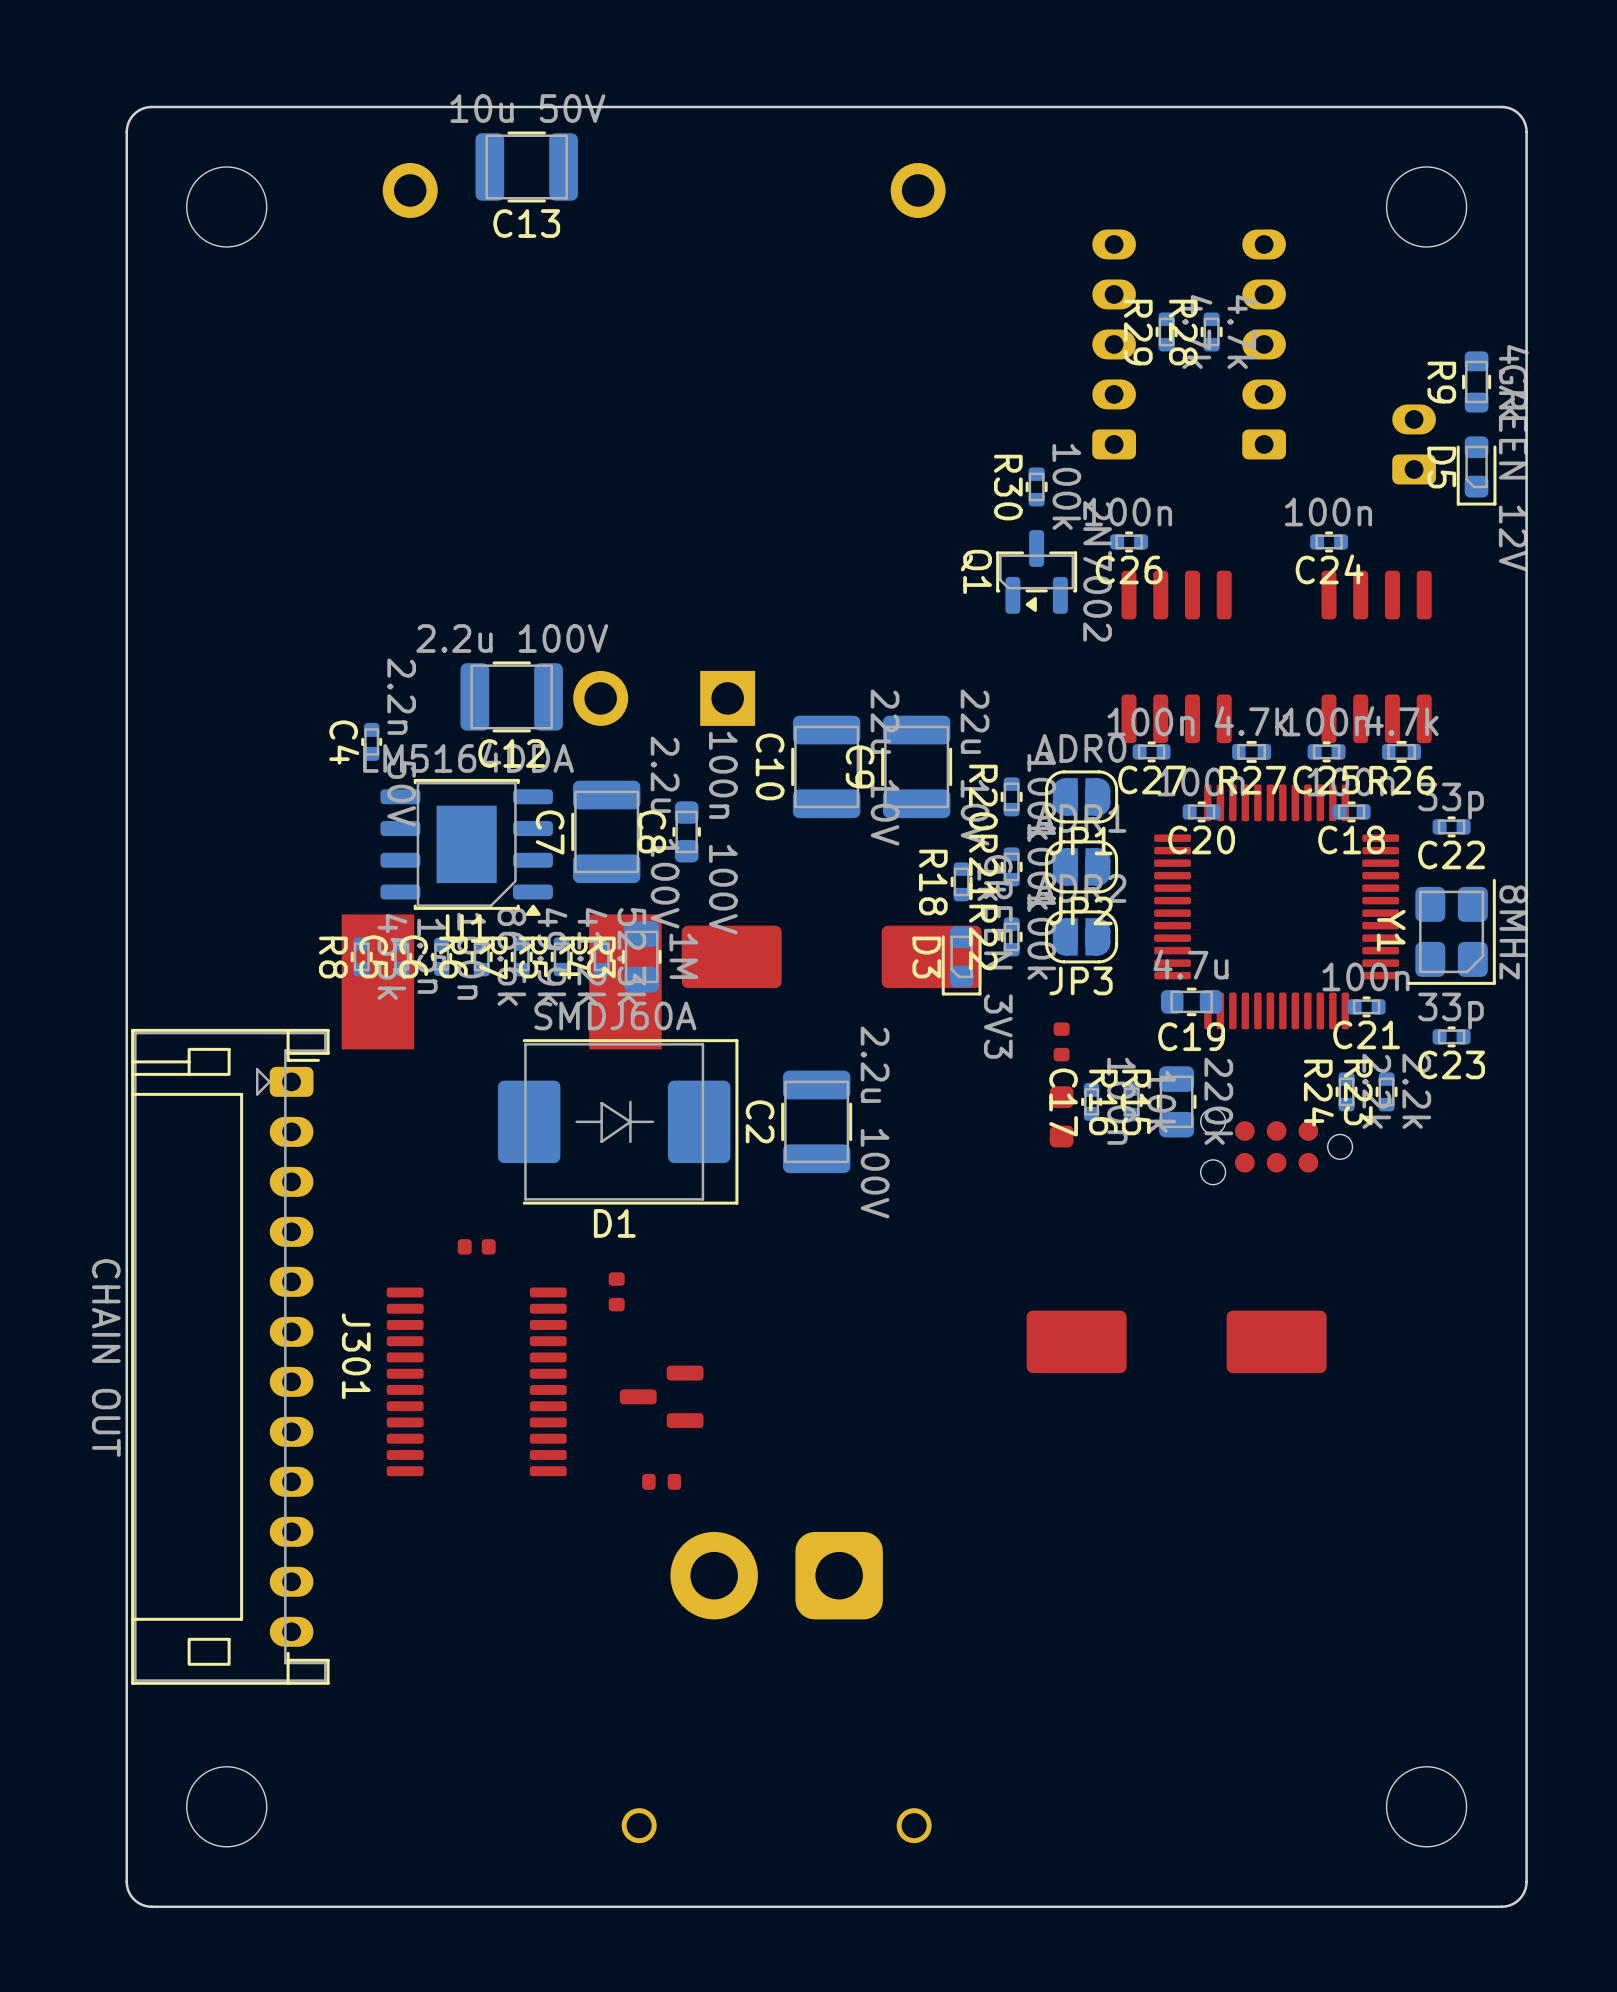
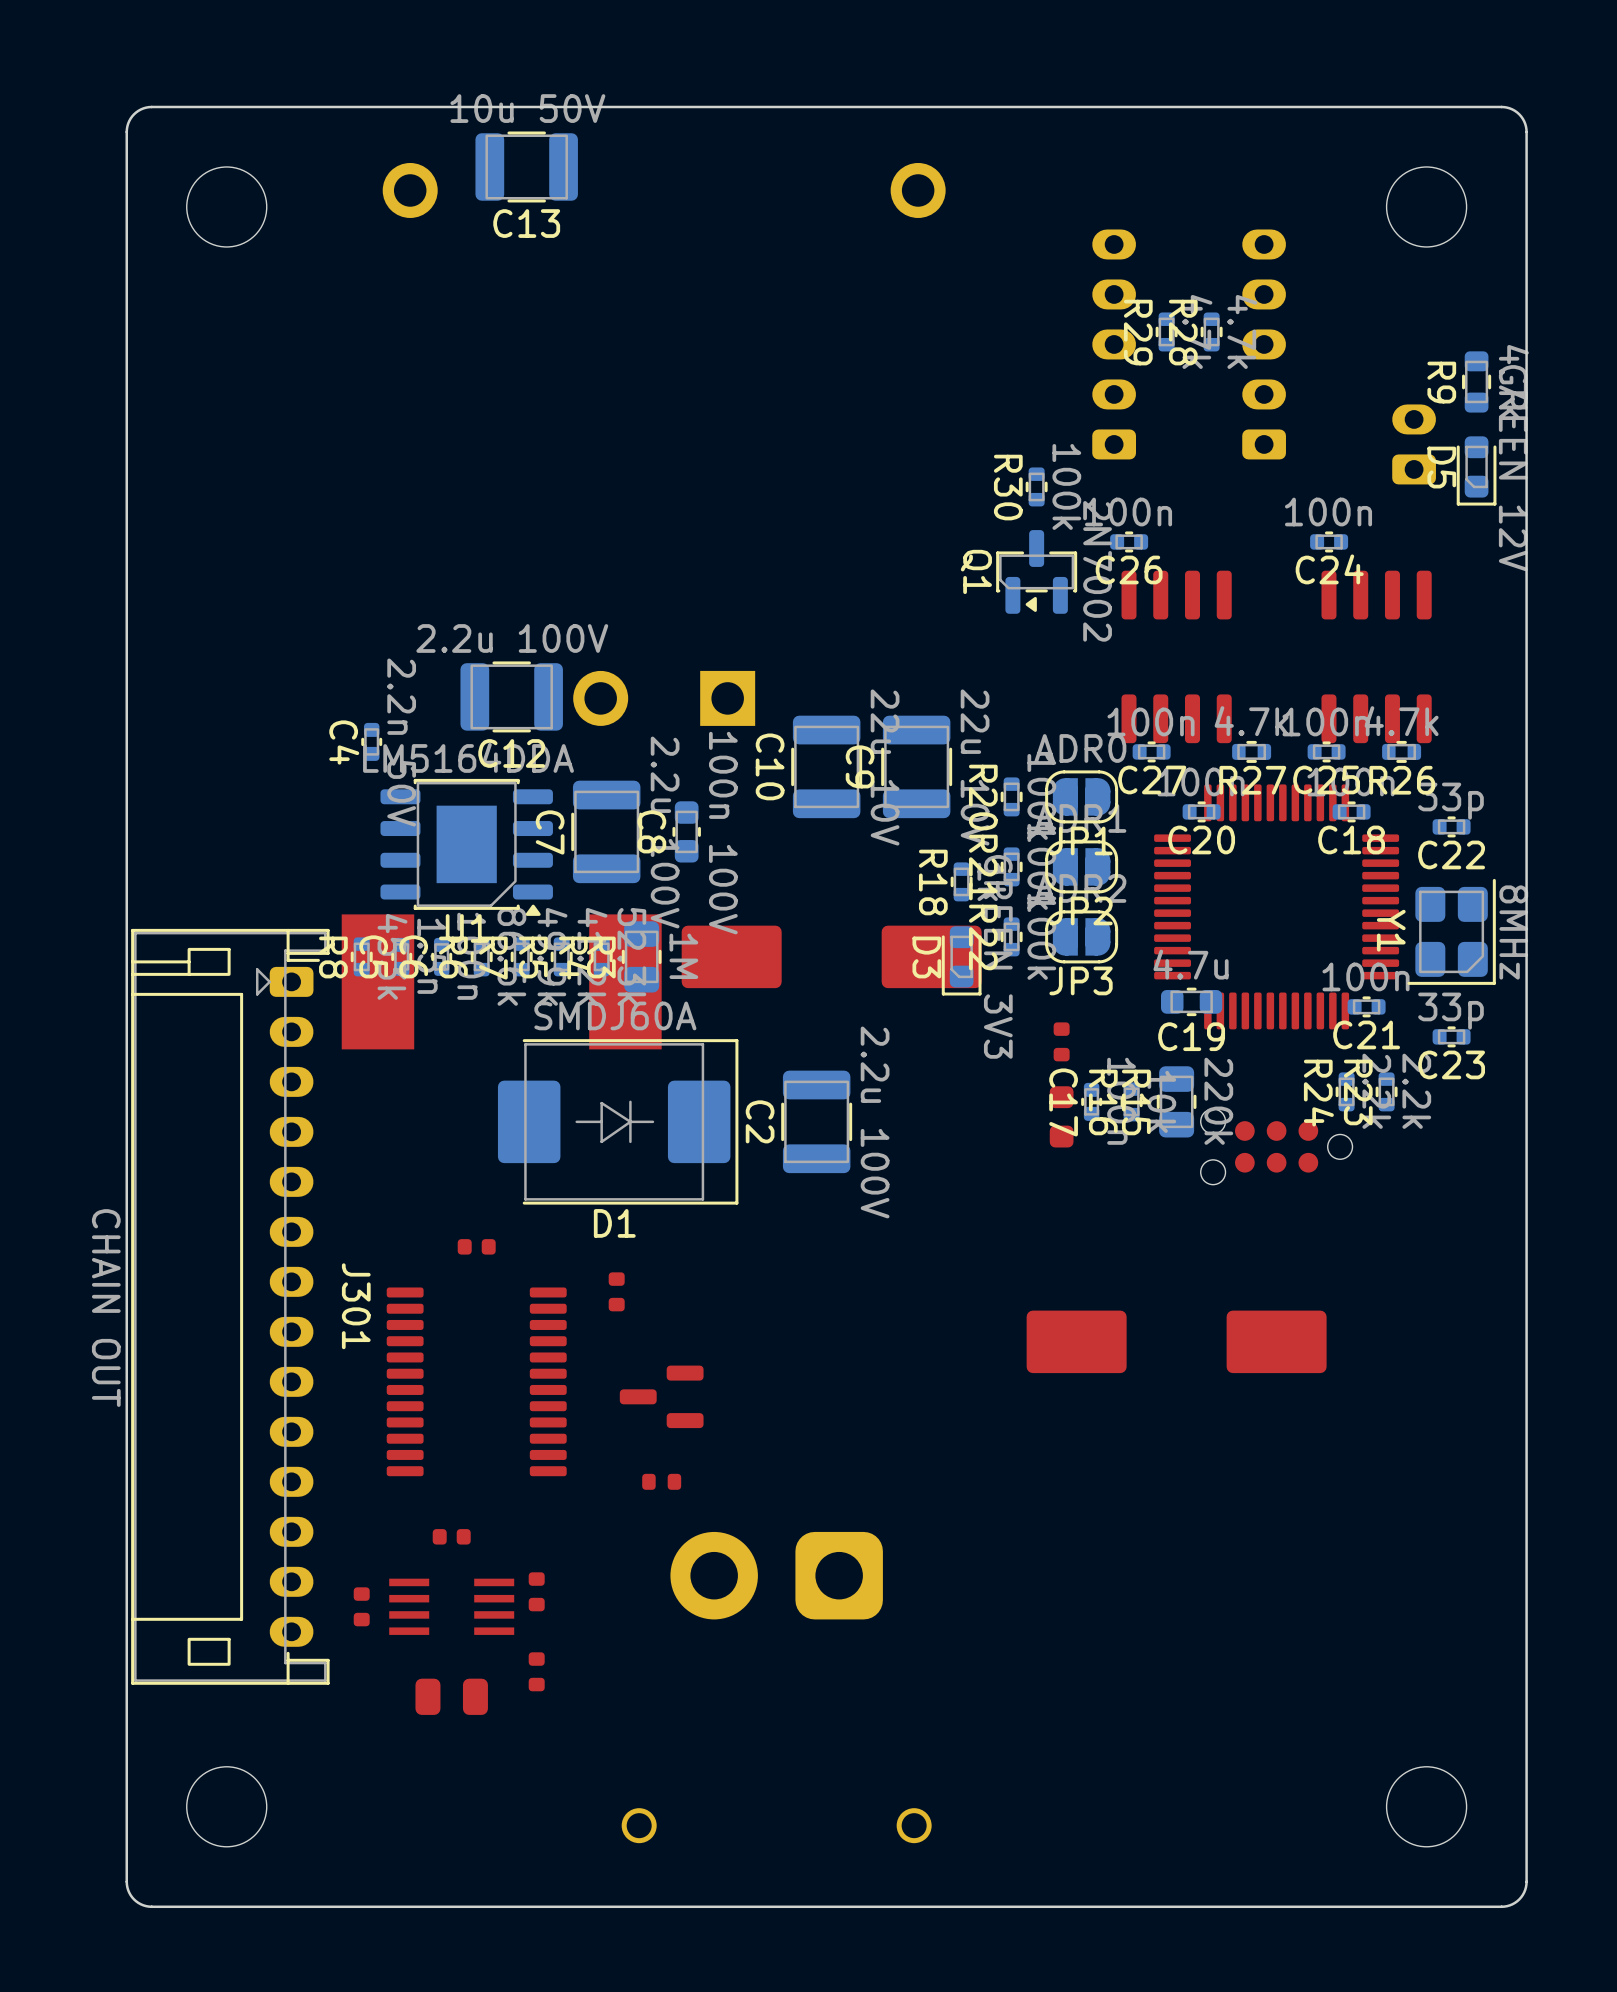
J301 footprint: [131, 1028, 330, 1685] -> [131, 928, 330, 1685]
part: none -> (451, 1536)
part: none -> (536, 1591)
part: none -> (361, 1606)
part: none -> (451, 1606)
part: none -> (536, 1671)
part: none -> (451, 1696)

